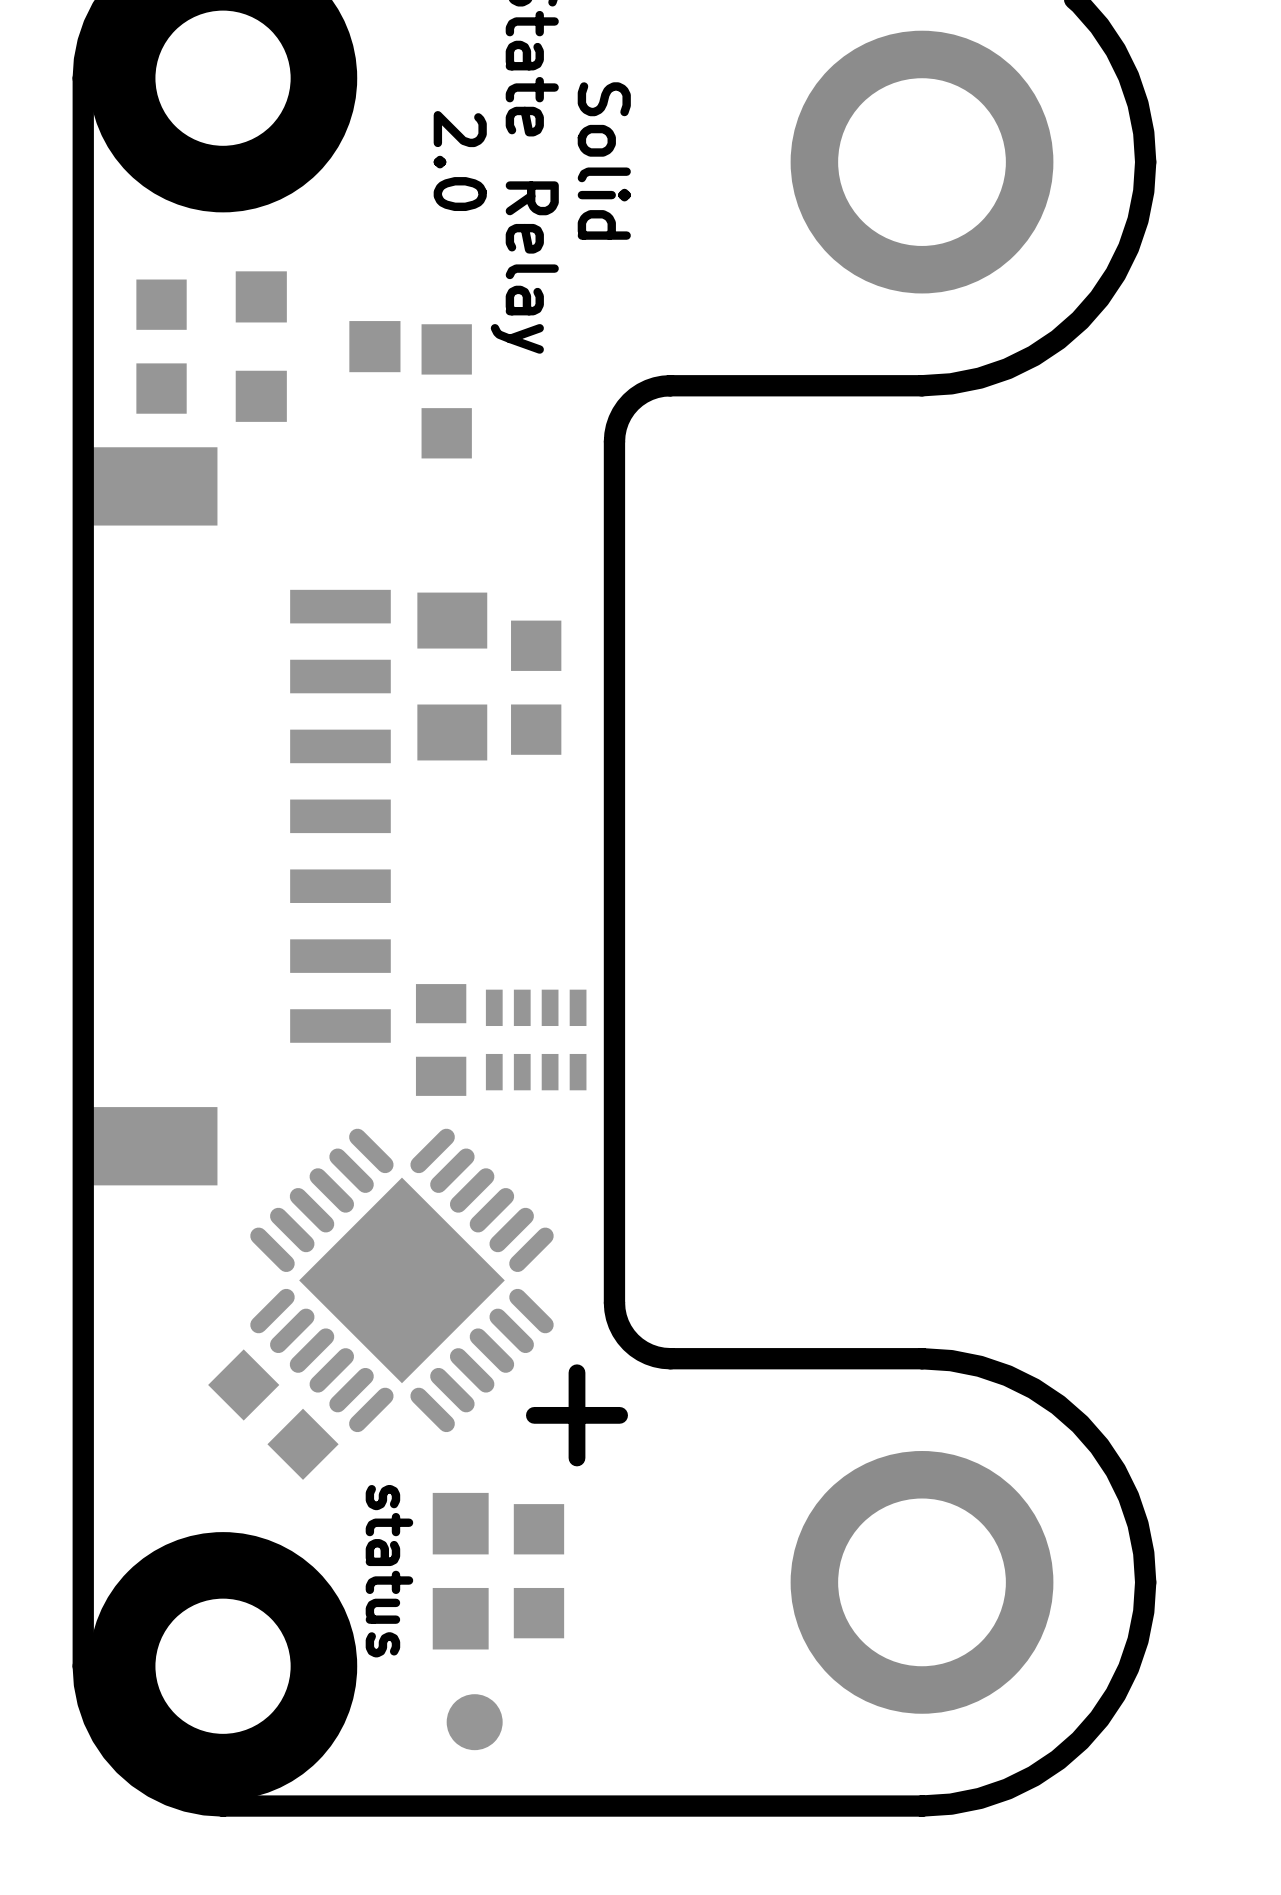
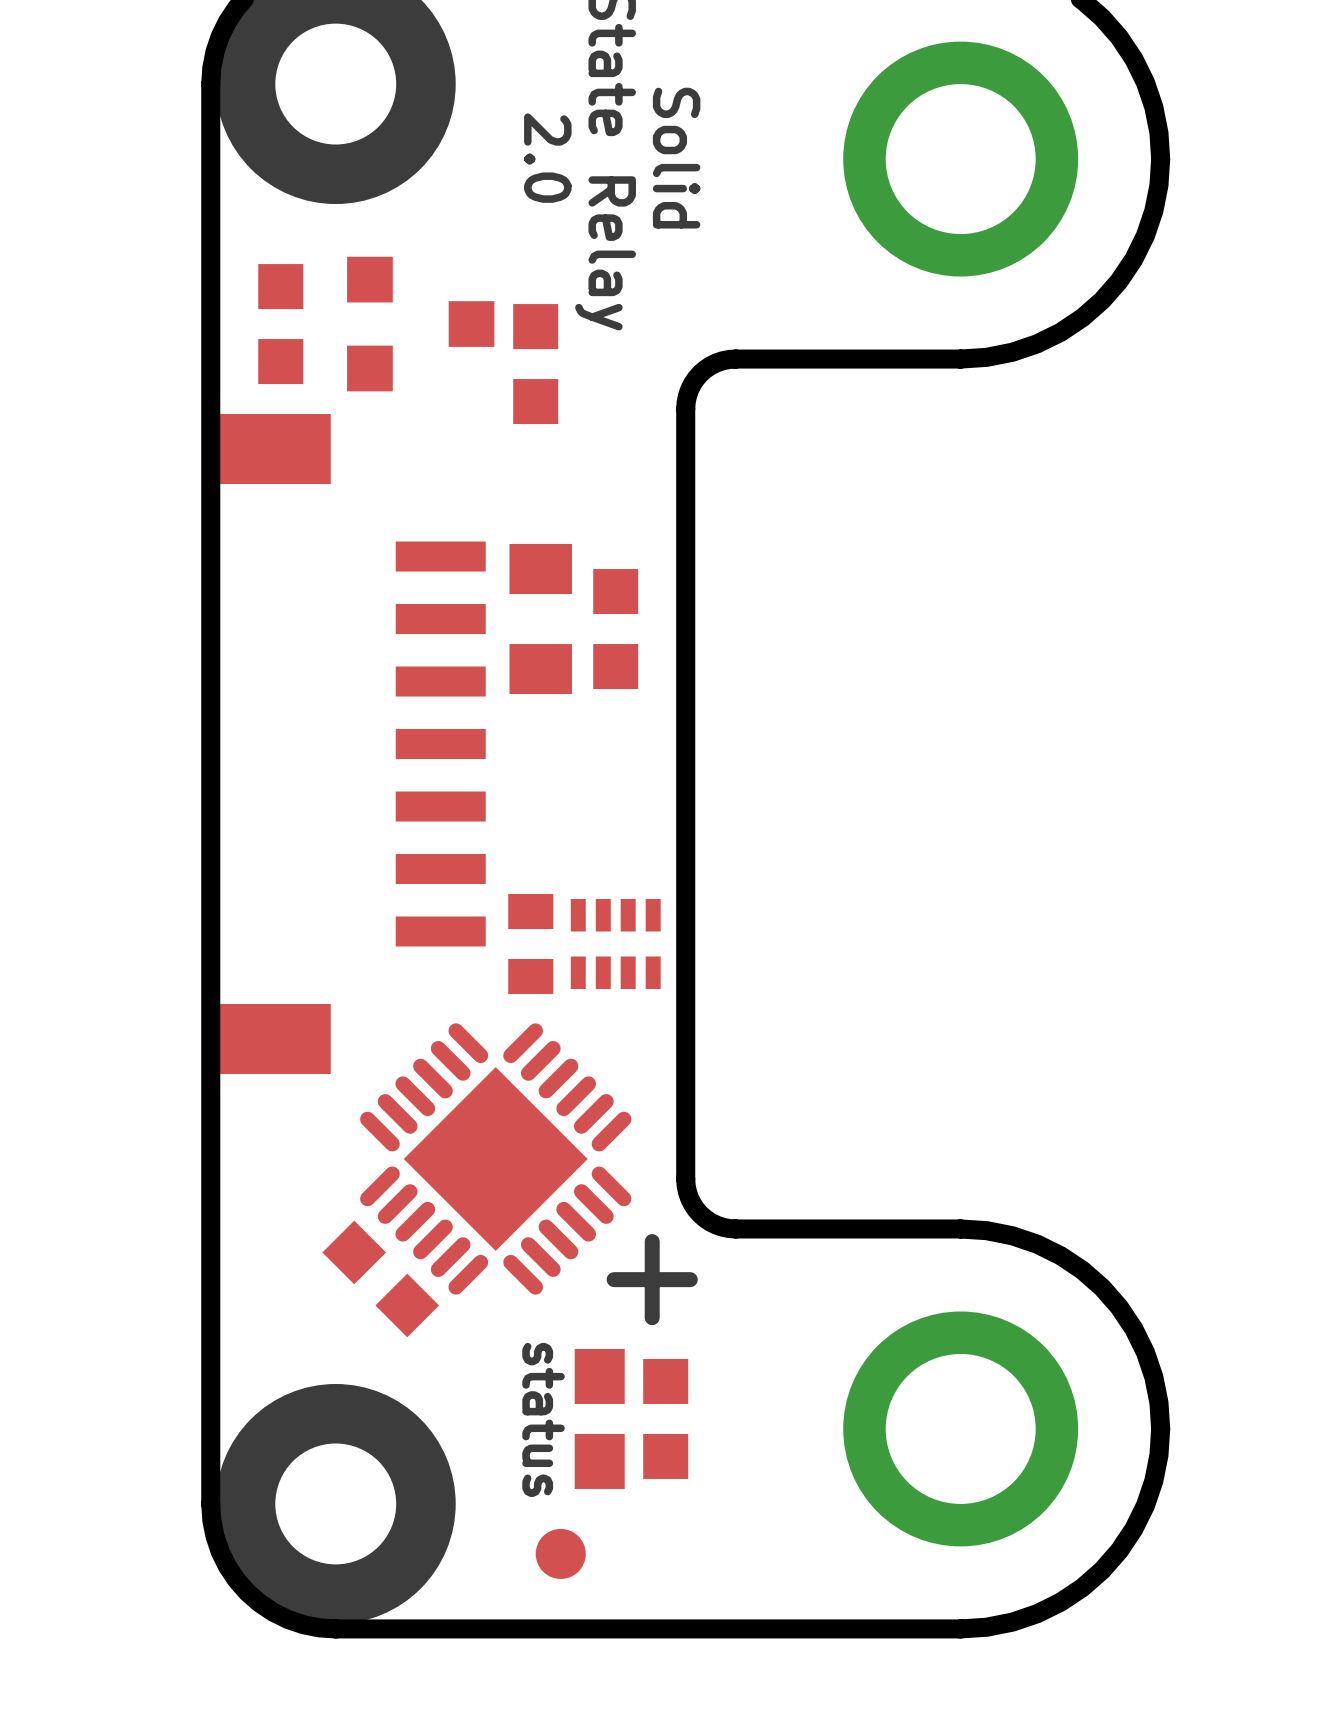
part footprint: [513, 1504, 565, 1639] -> [574, 1348, 625, 1489]
text position: status (389, 1571) -> status (543, 1419)
part: (460, 1571) -> none
part: none -> (665, 1418)

